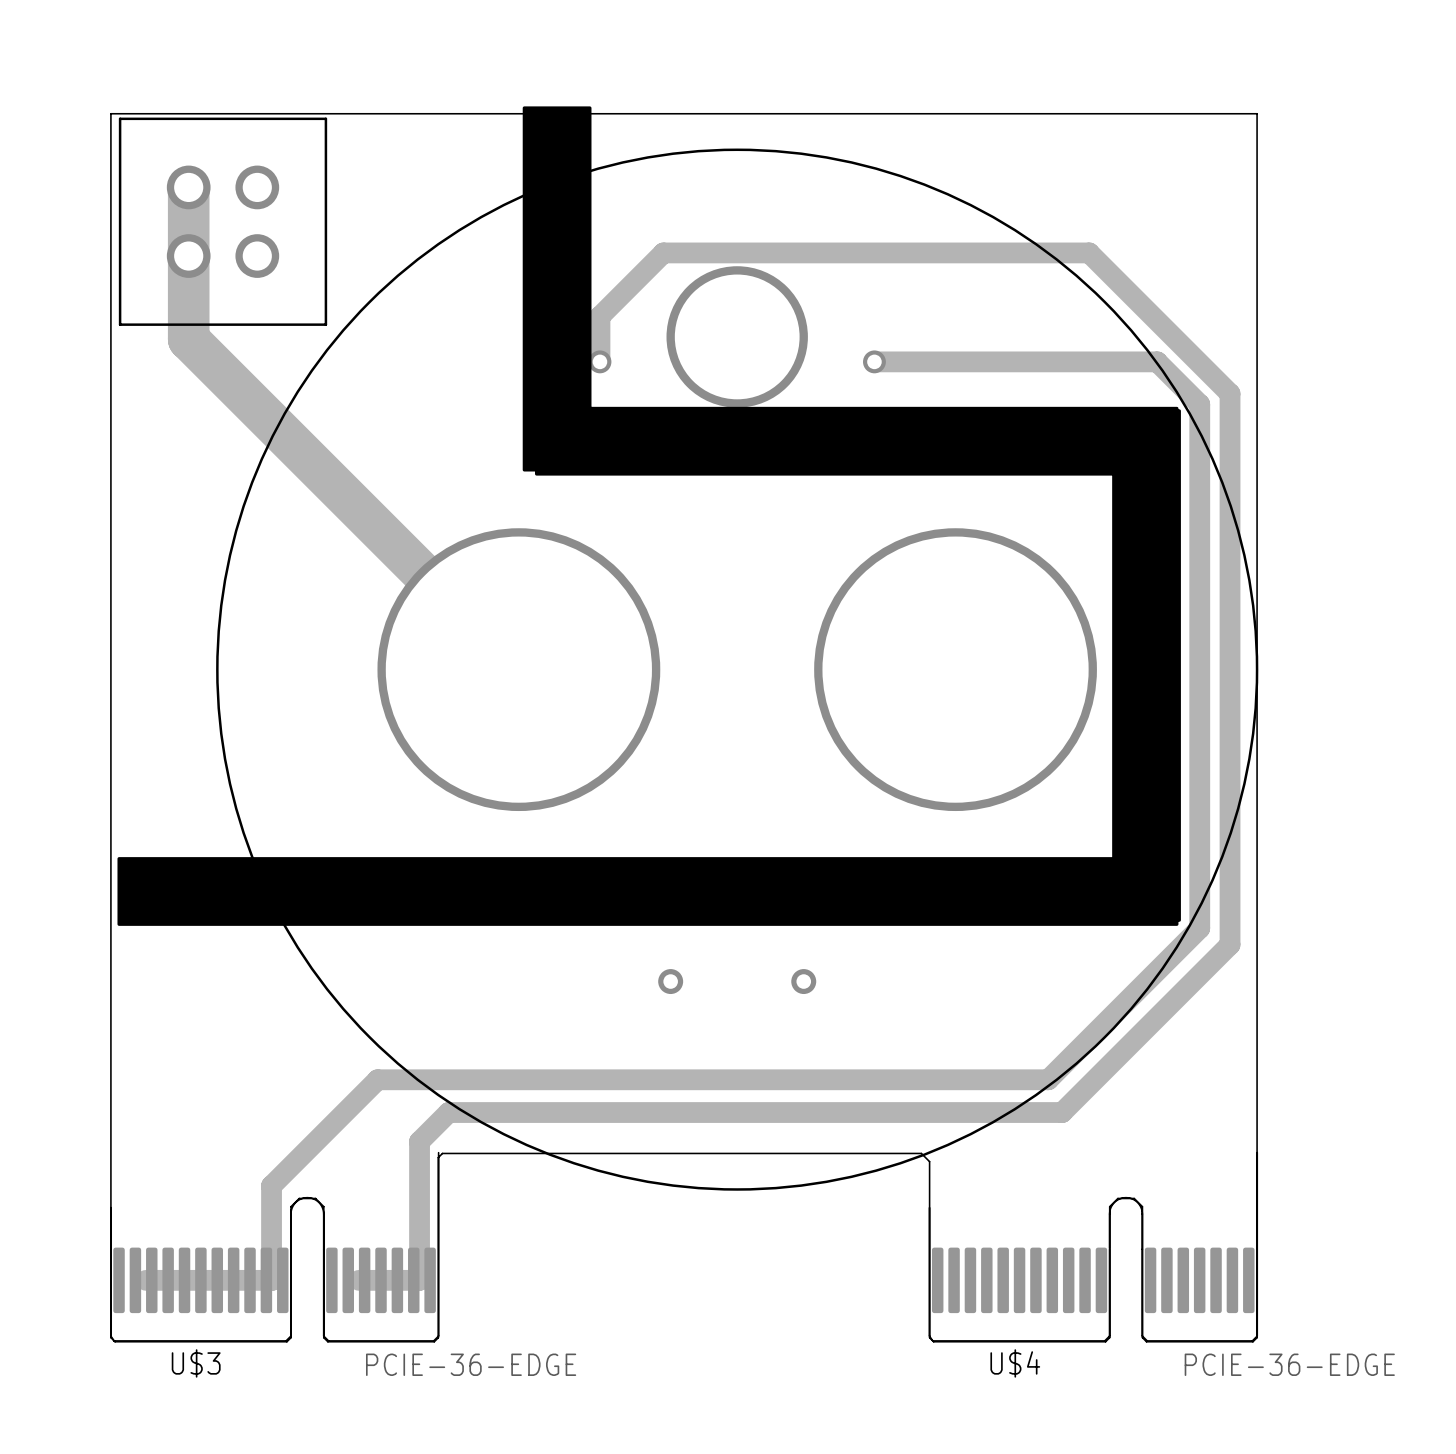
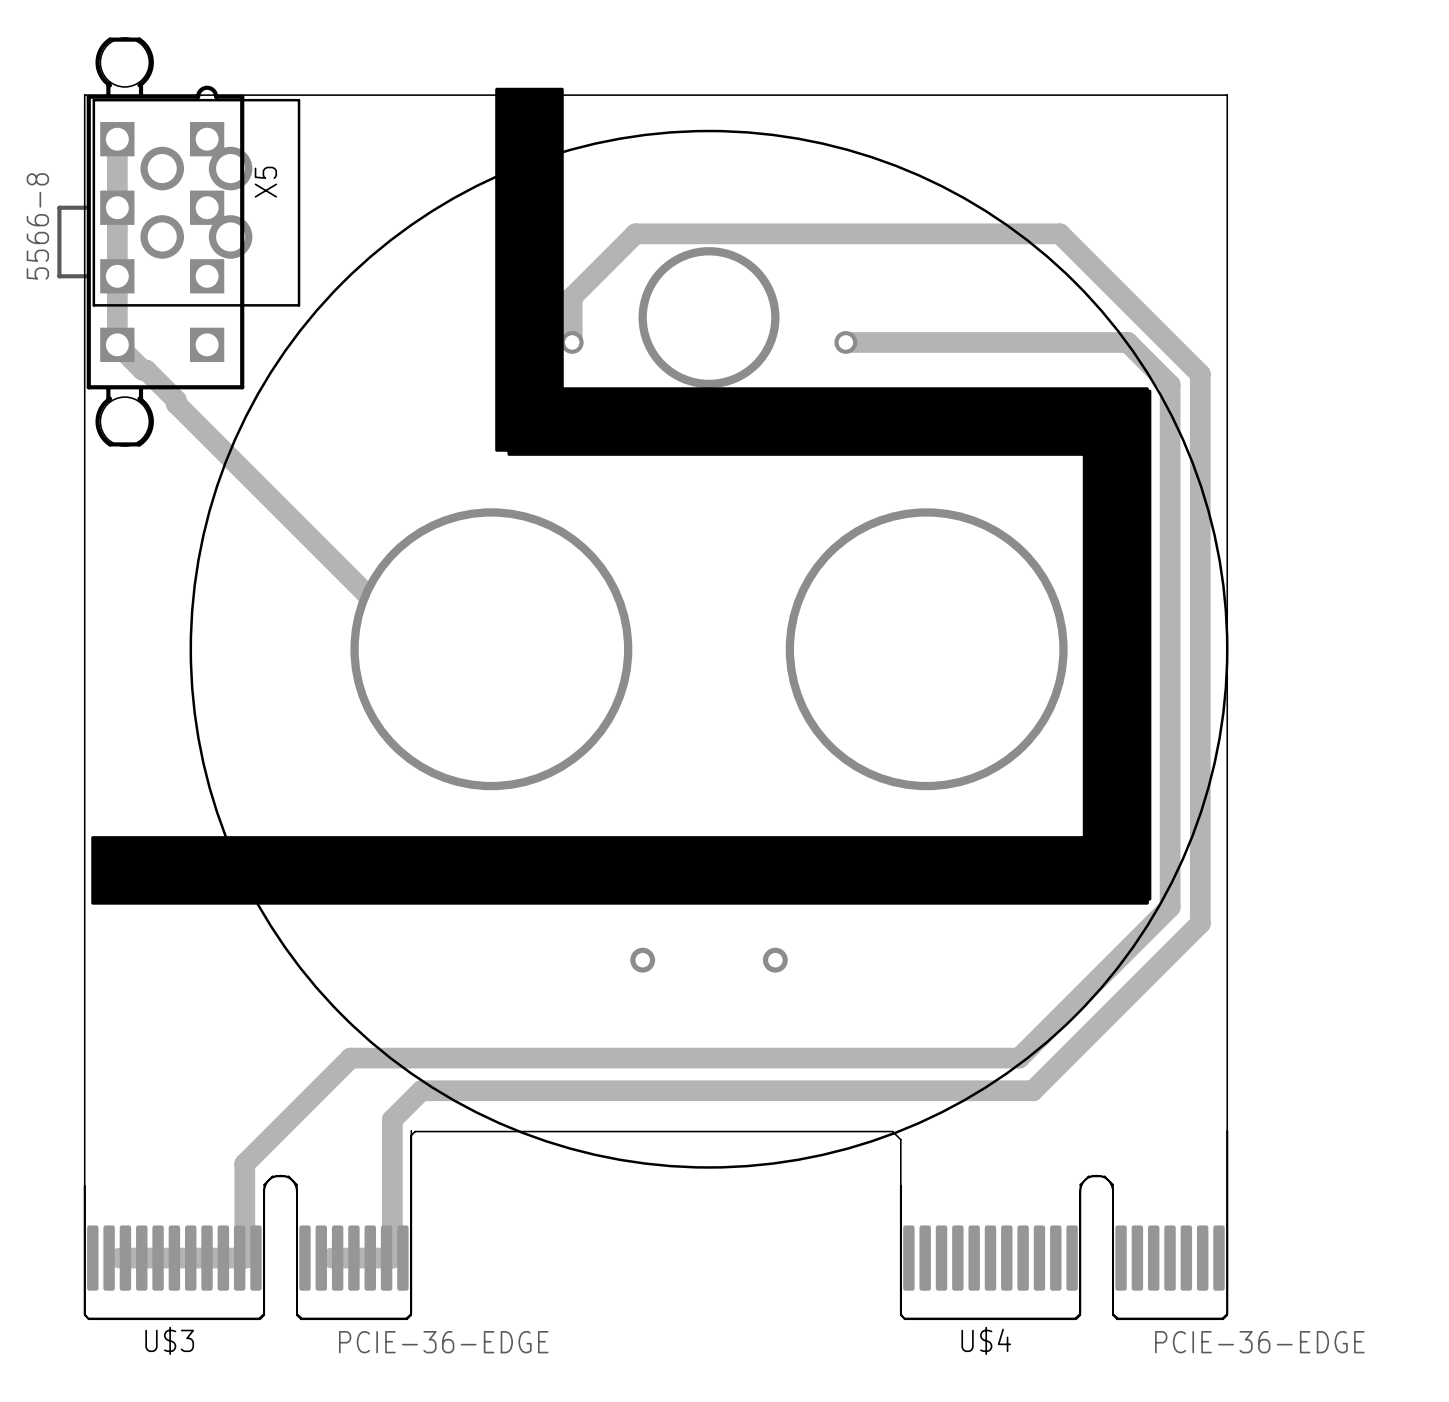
track: (188, 187) (188, 339) (518, 669) -> (117, 139) (117, 344) (142, 370) (146, 370) (176, 400) (176, 403) (421, 649) (491, 649)
X5: none -> 5566-8 (150, 242)

